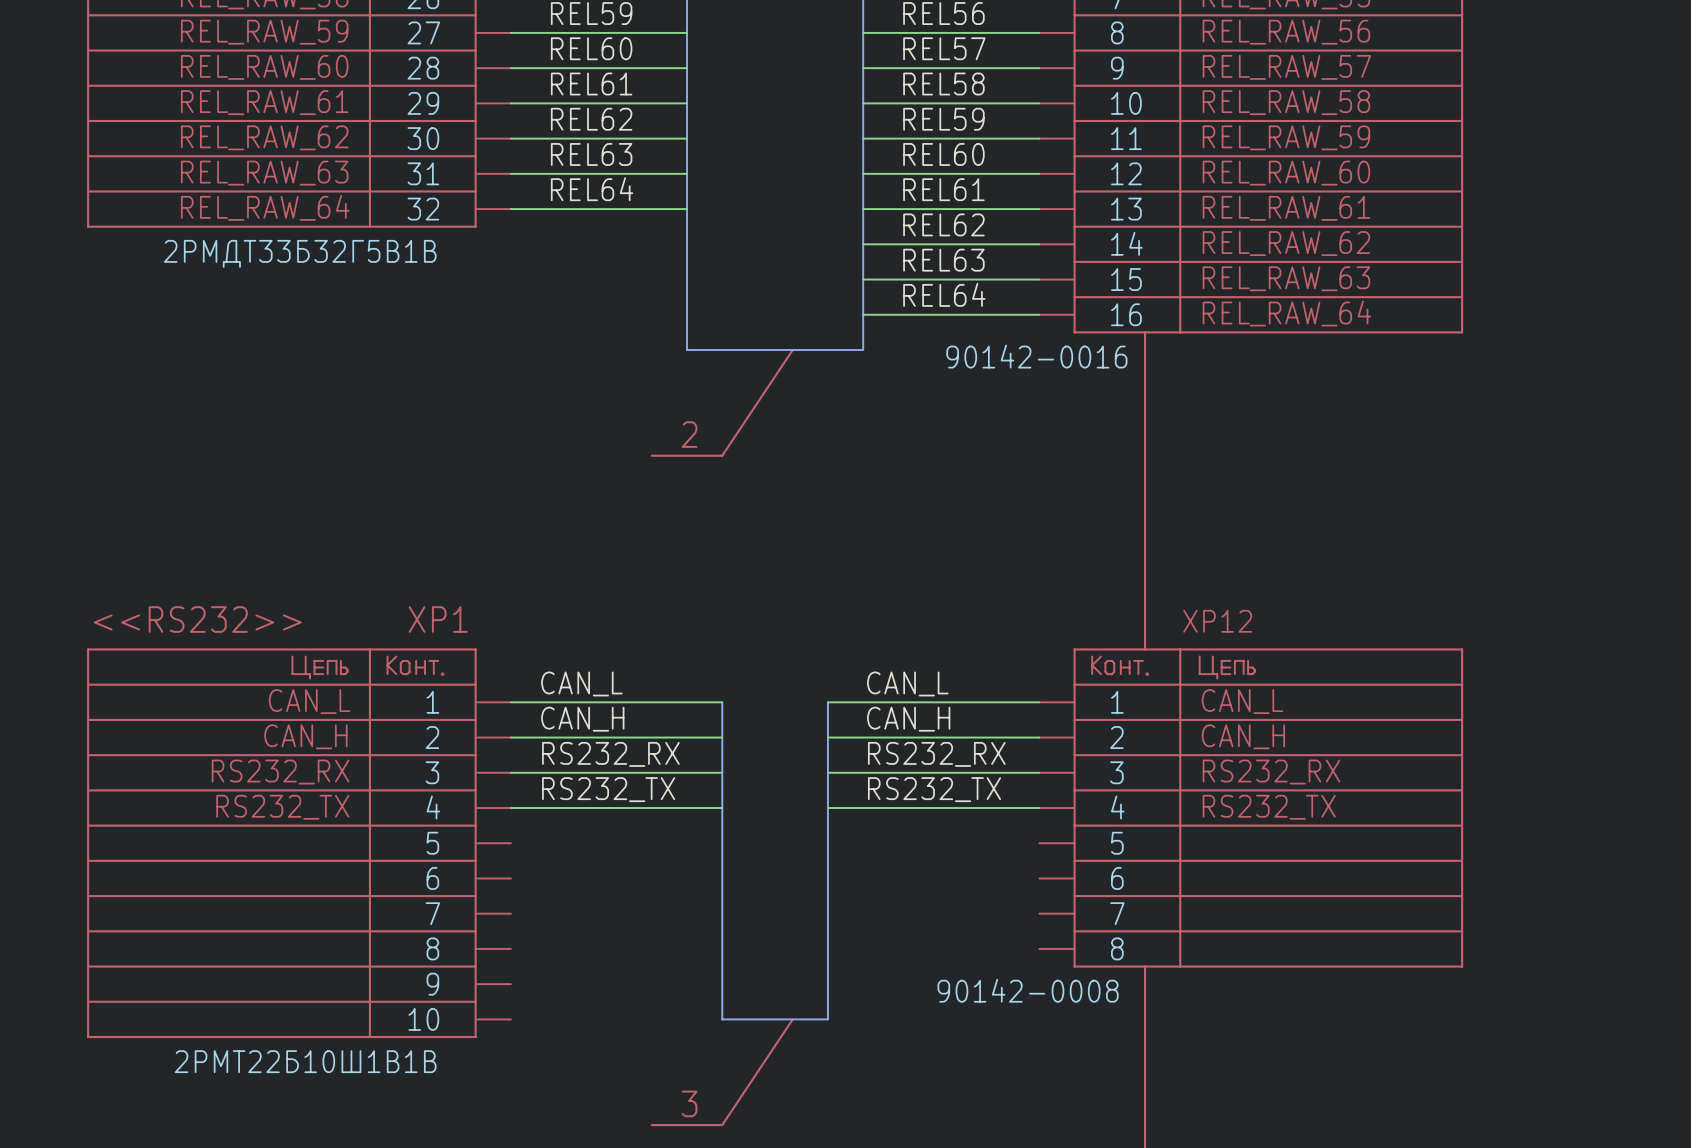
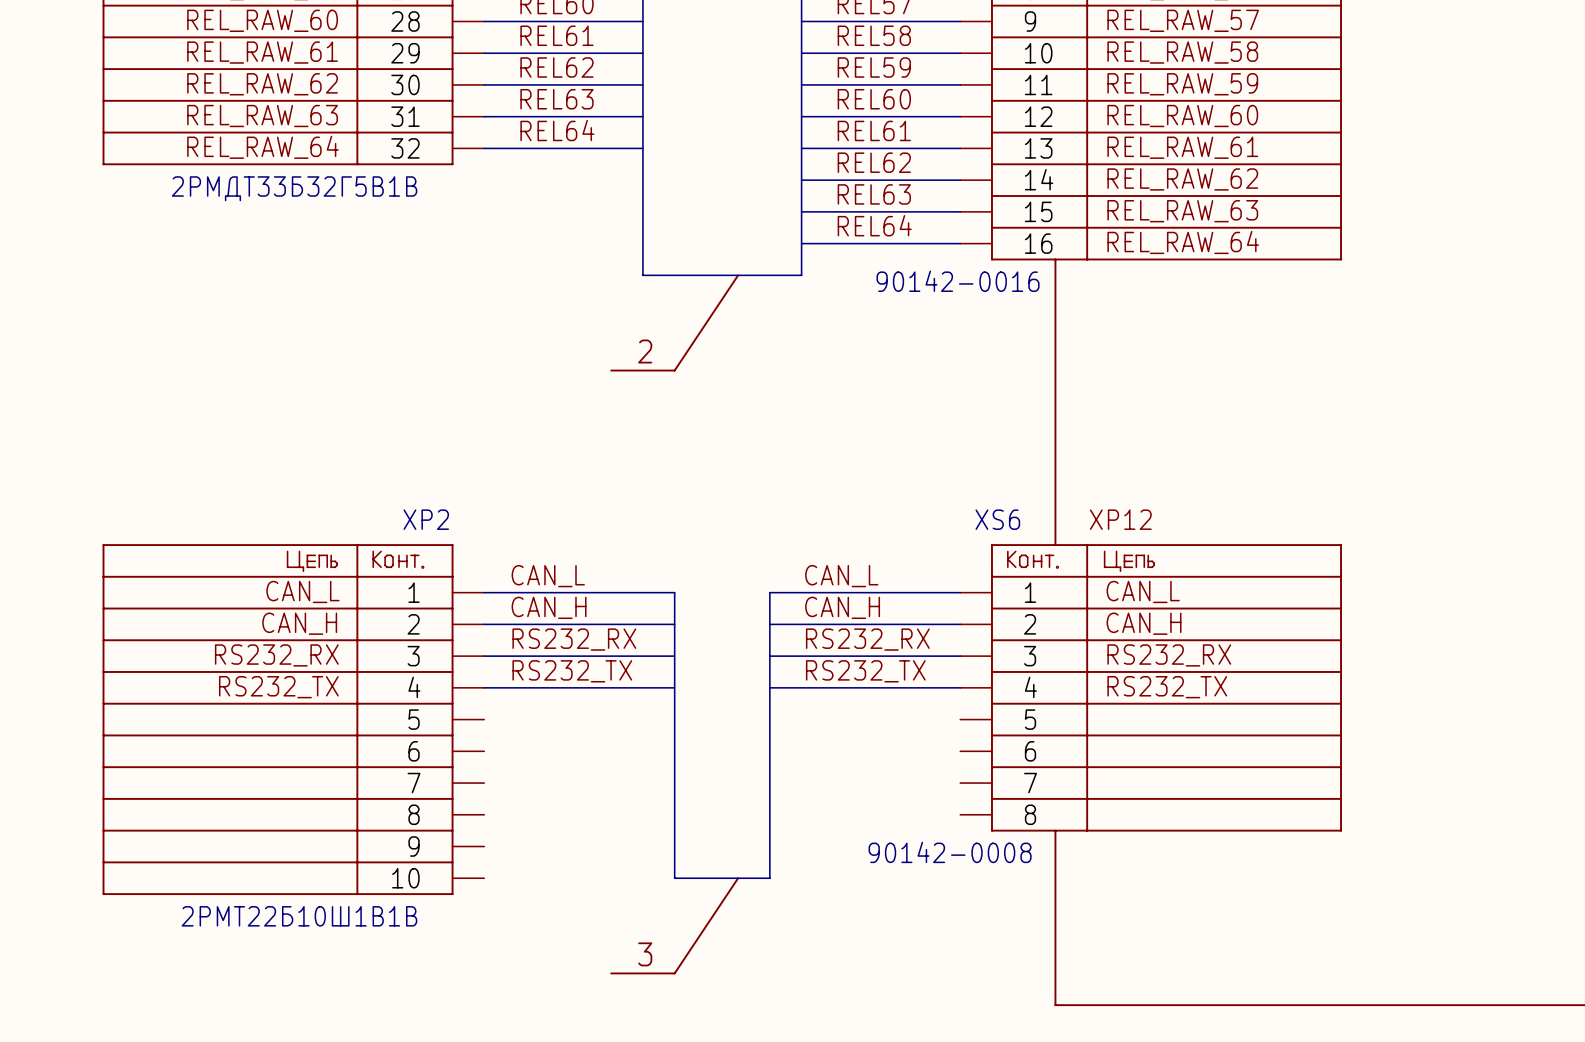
text: <<RS232>> (197, 619) -> none
text: XP1 (438, 619) -> none
XP2 name: none -> XP2 (426, 519)
XS6 name: none -> XS6 (997, 519)

